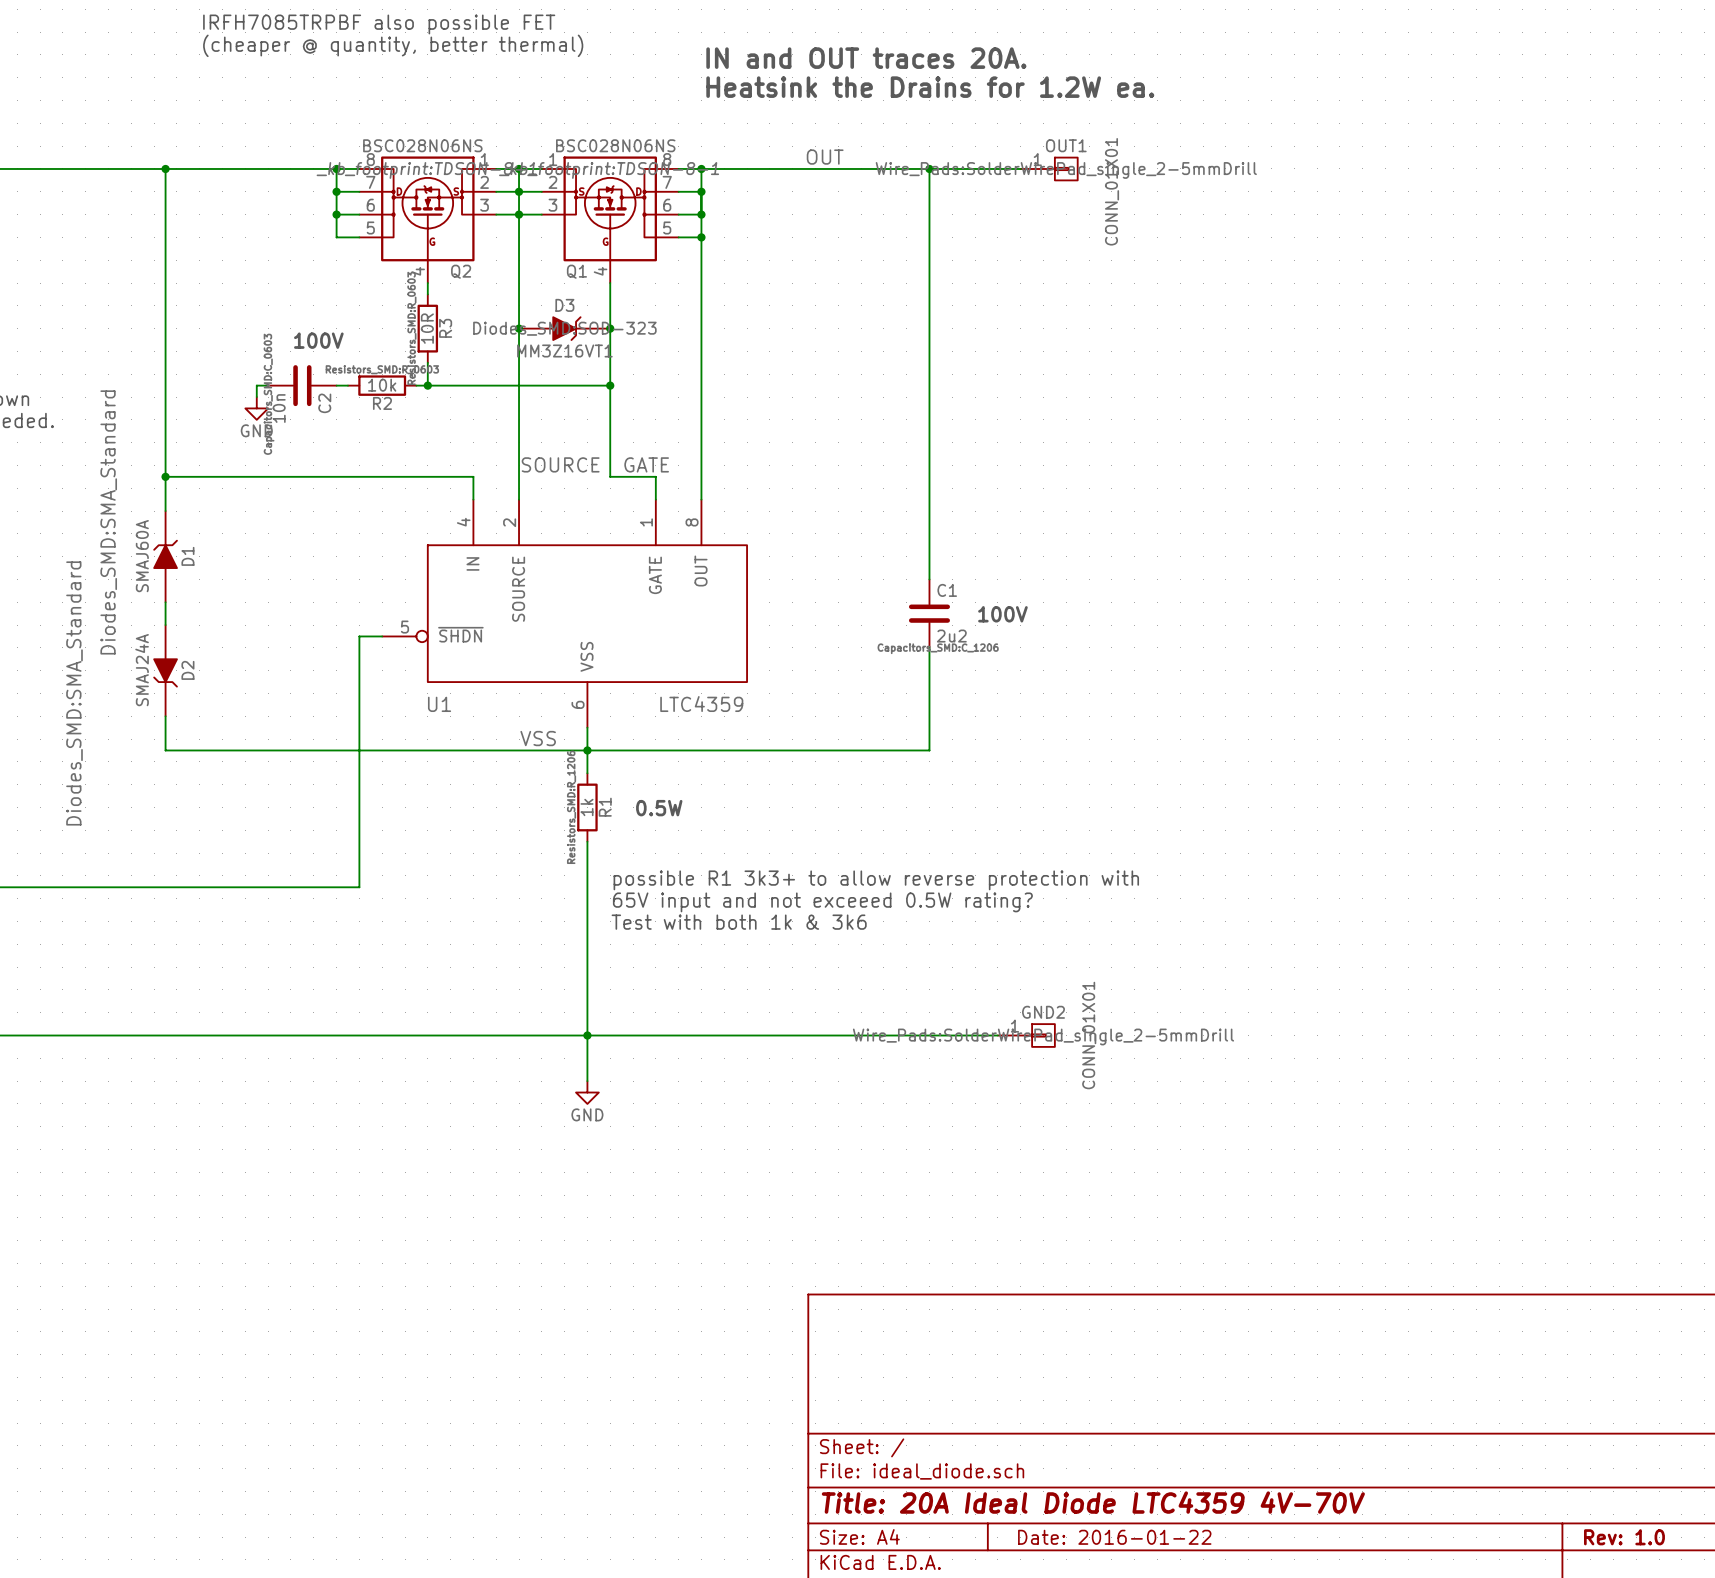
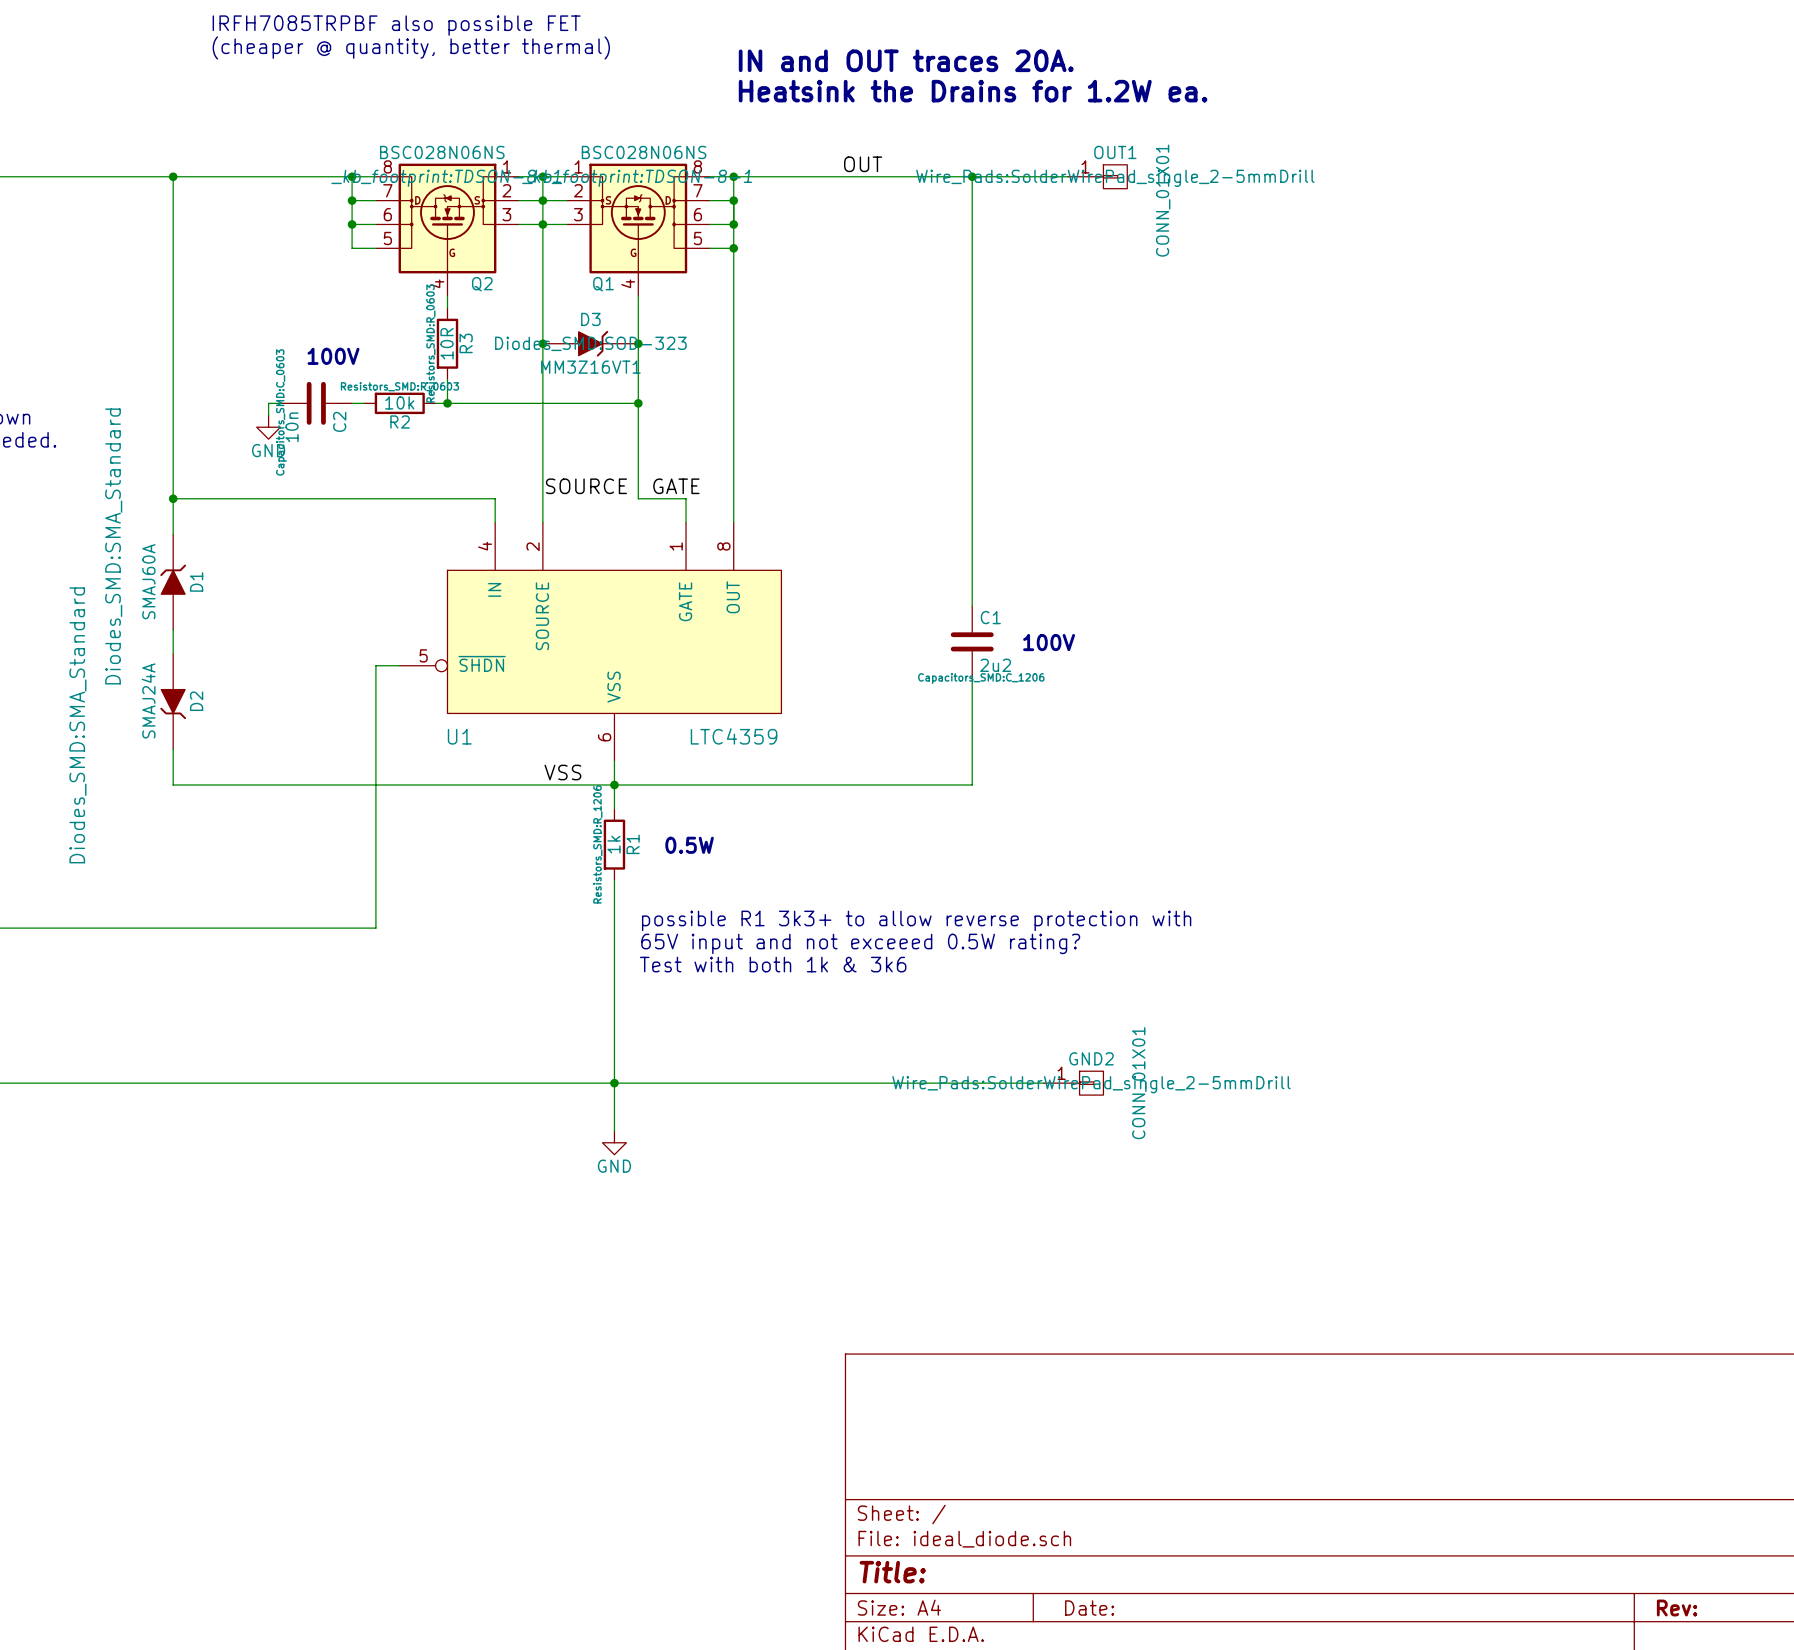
title block: Title: 20A Ideal Diode LTC4359 4V-70V (1093, 1502) -> Title: (892, 1572)
title block: Date: 2016-01-22 (1114, 1537) -> Date: (1089, 1608)
title block: Rev: 1.0 (1624, 1537) -> Rev: (1677, 1608)

